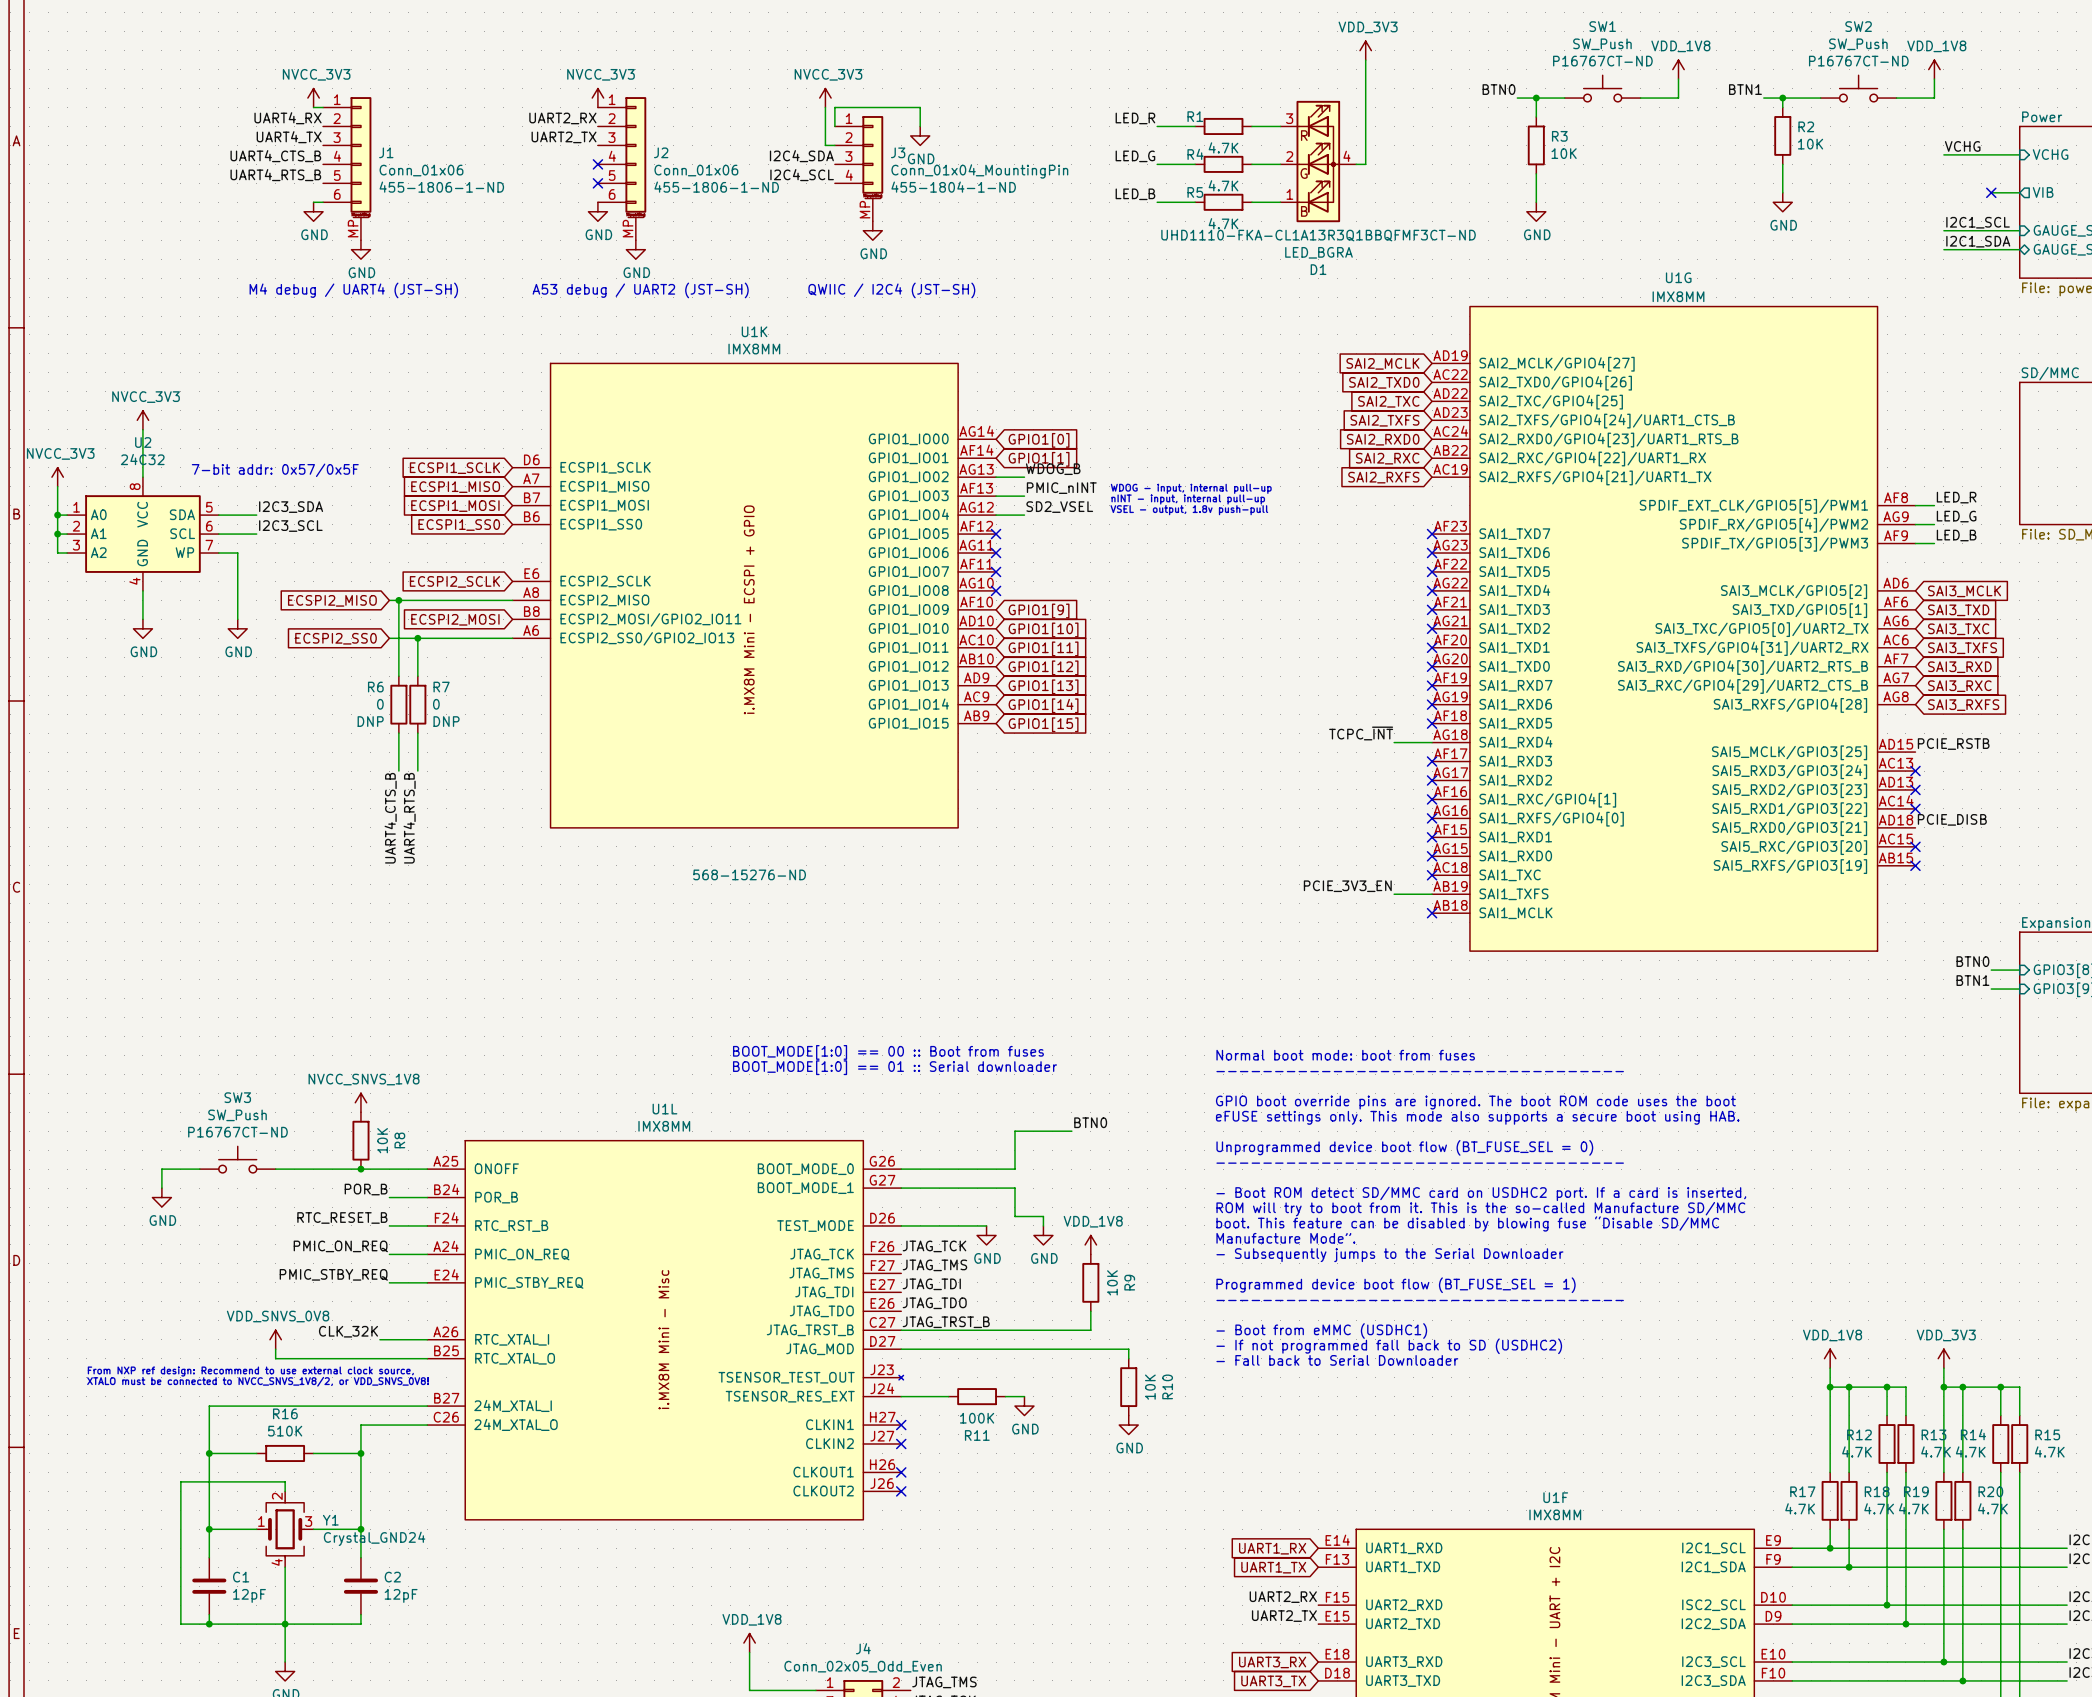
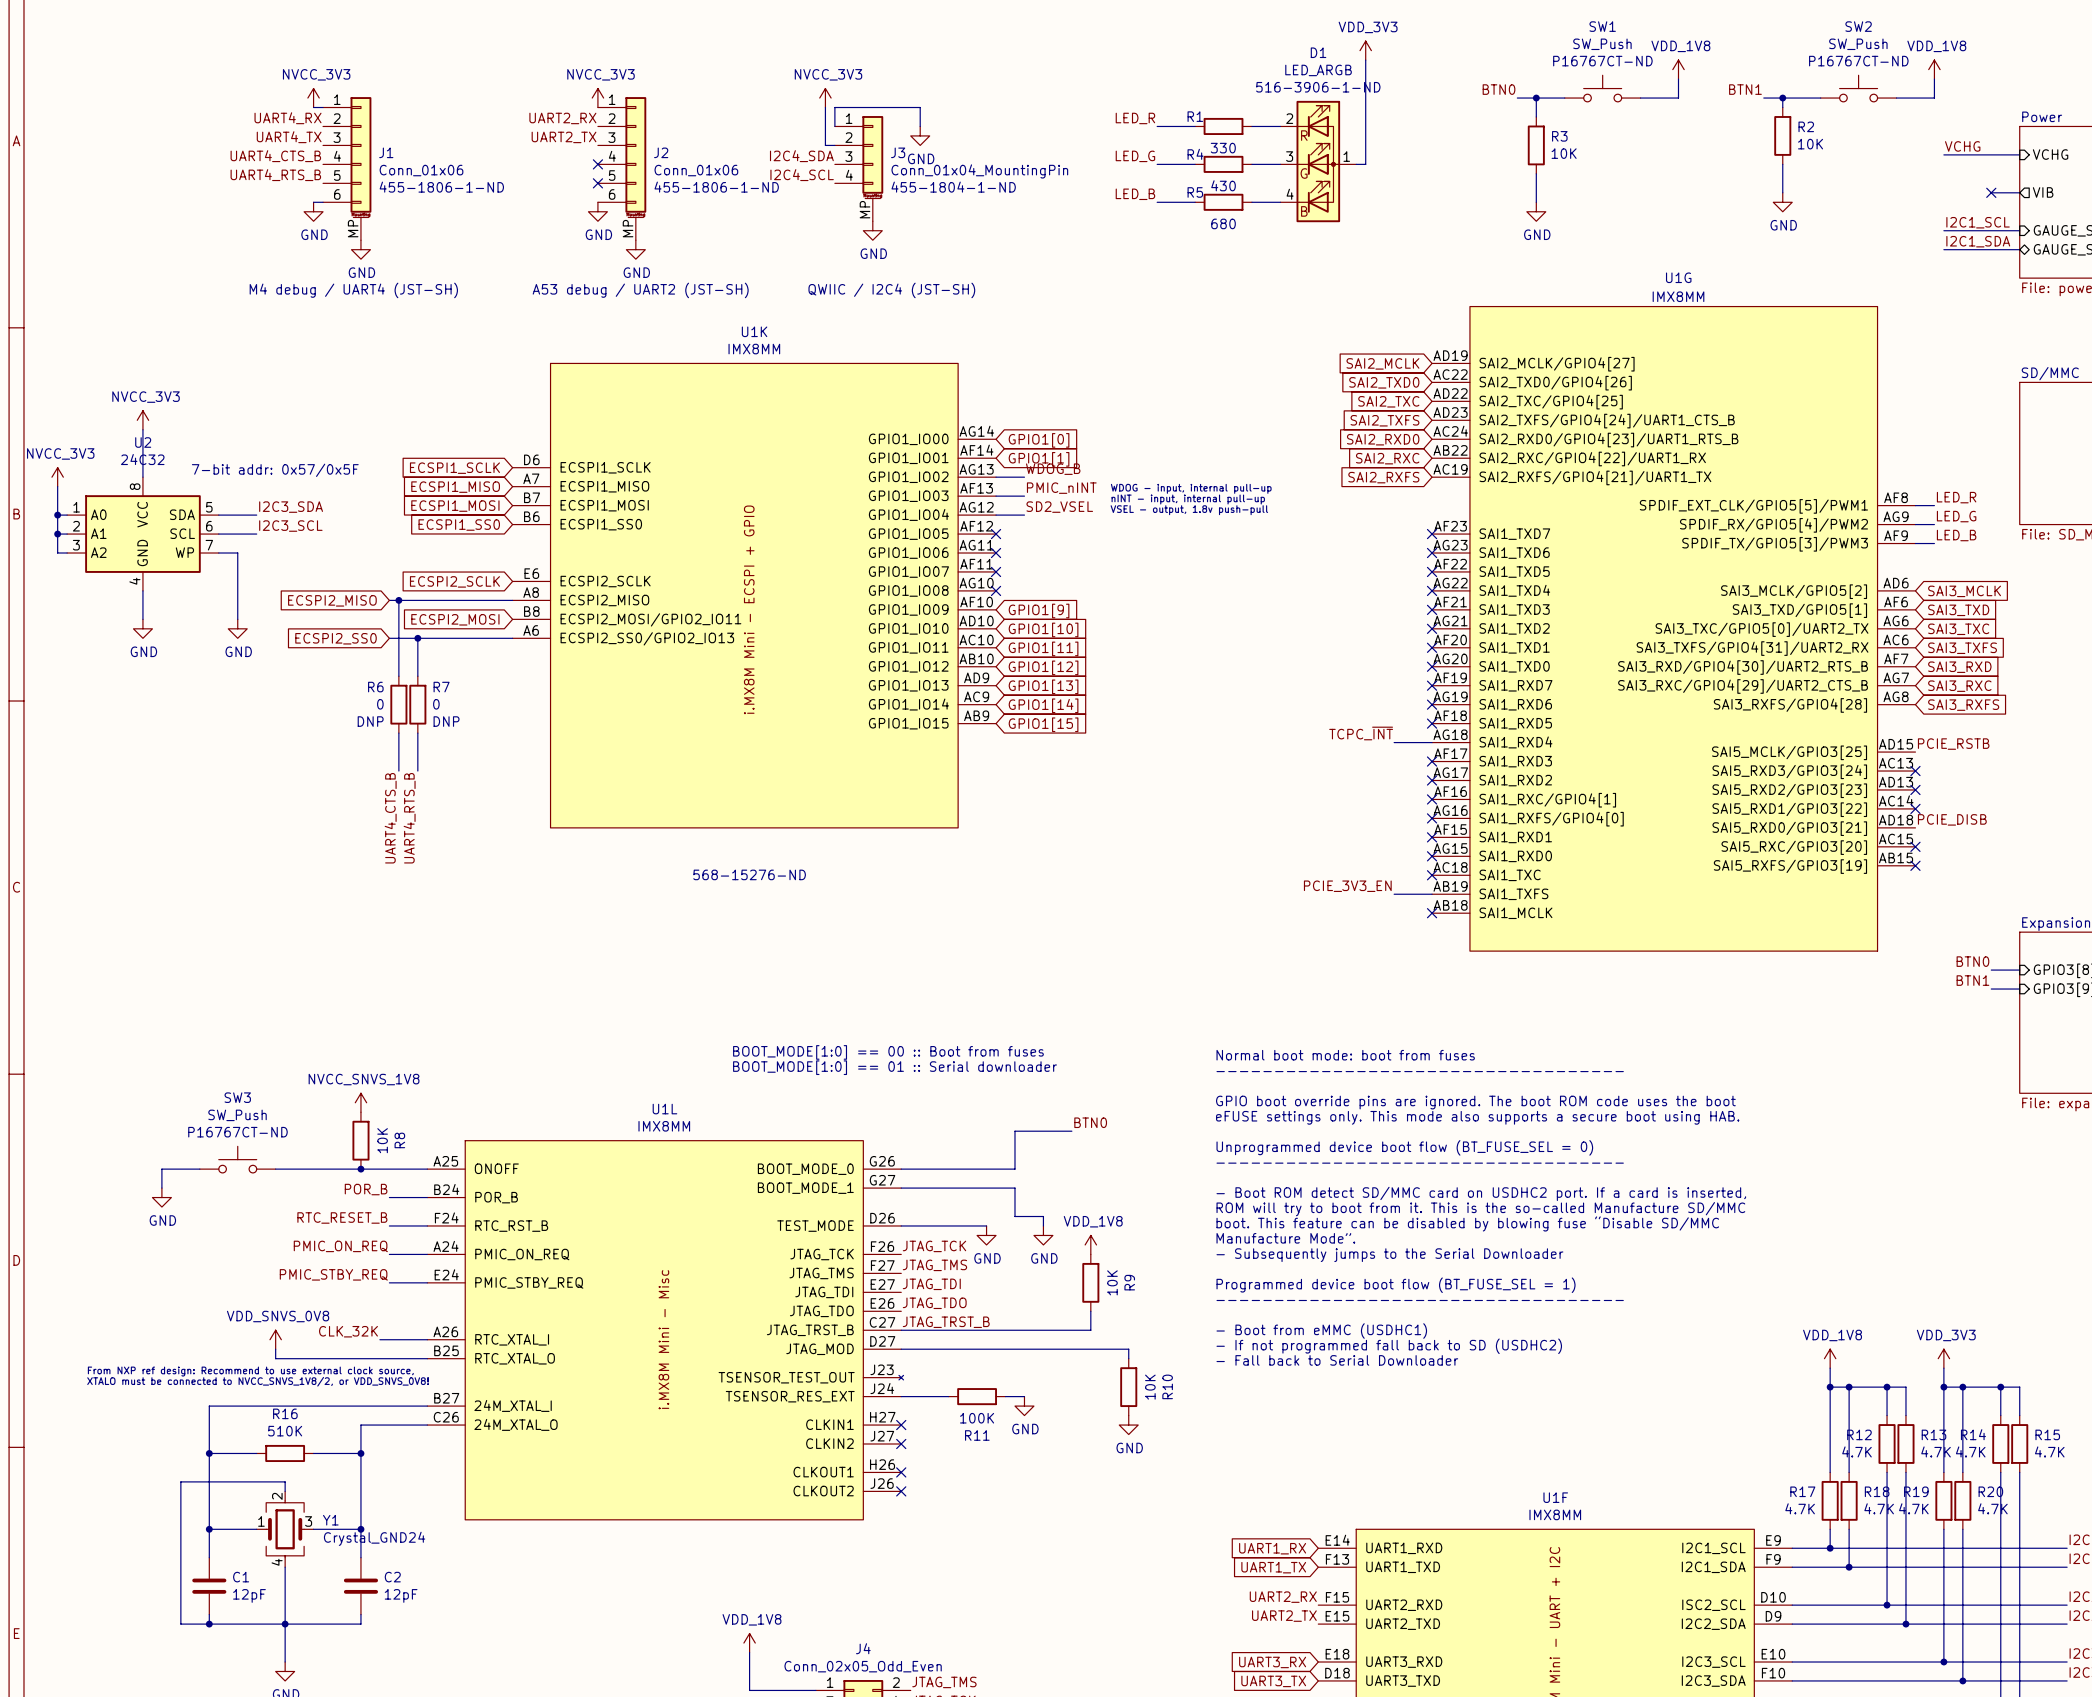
D1 pin number: 3 (1289, 118) -> 2 (1289, 118)
R1 value: 4.7K (1223, 147) -> 330 (1223, 148)
D1 pin number: 2 (1289, 156) -> 3 (1289, 156)
D1 pin number: 4 (1346, 156) -> 1 (1346, 156)
R4 value: 4.7K (1223, 185) -> 430 (1223, 185)
D1 pin number: 1 (1289, 194) -> 4 (1290, 194)
R5 value: 4.7K (1223, 223) -> 680 (1223, 223)
D1 text: UHD1110-FKA-CL1A13R3Q1BBQFMF3CT-ND (1318, 235) -> 516-3906-1-ND (1318, 87)
D1 value: LED_BGRA (1318, 252) -> LED_ARGB (1318, 70)
D1 name position: D1 (1318, 269) -> D1 (1318, 52)

